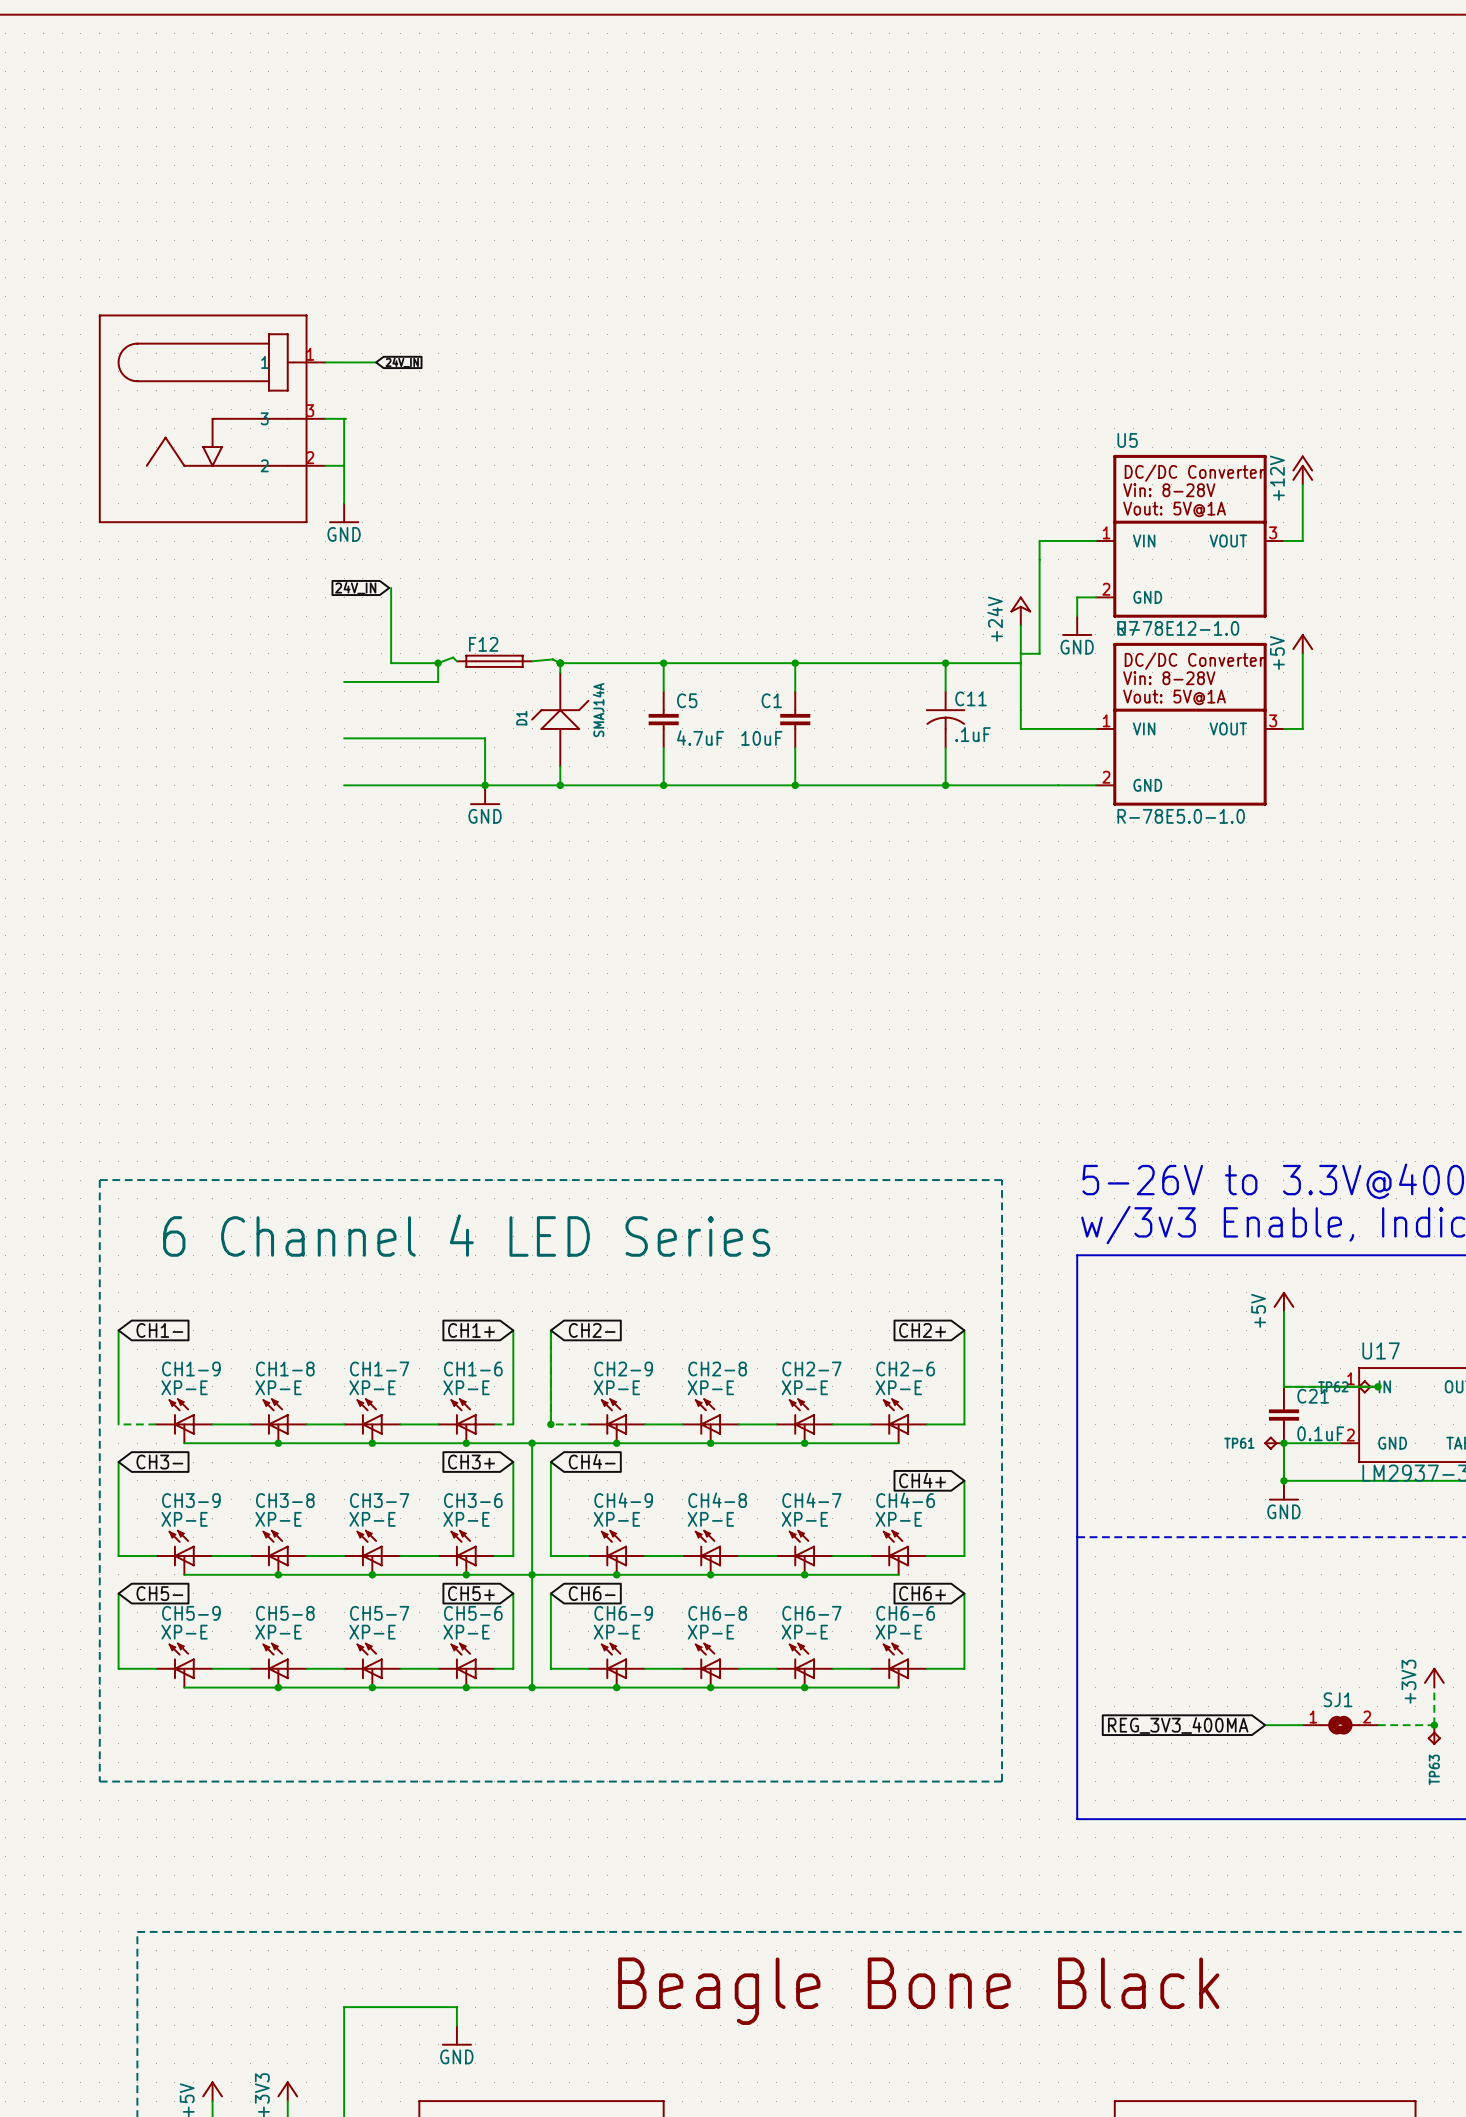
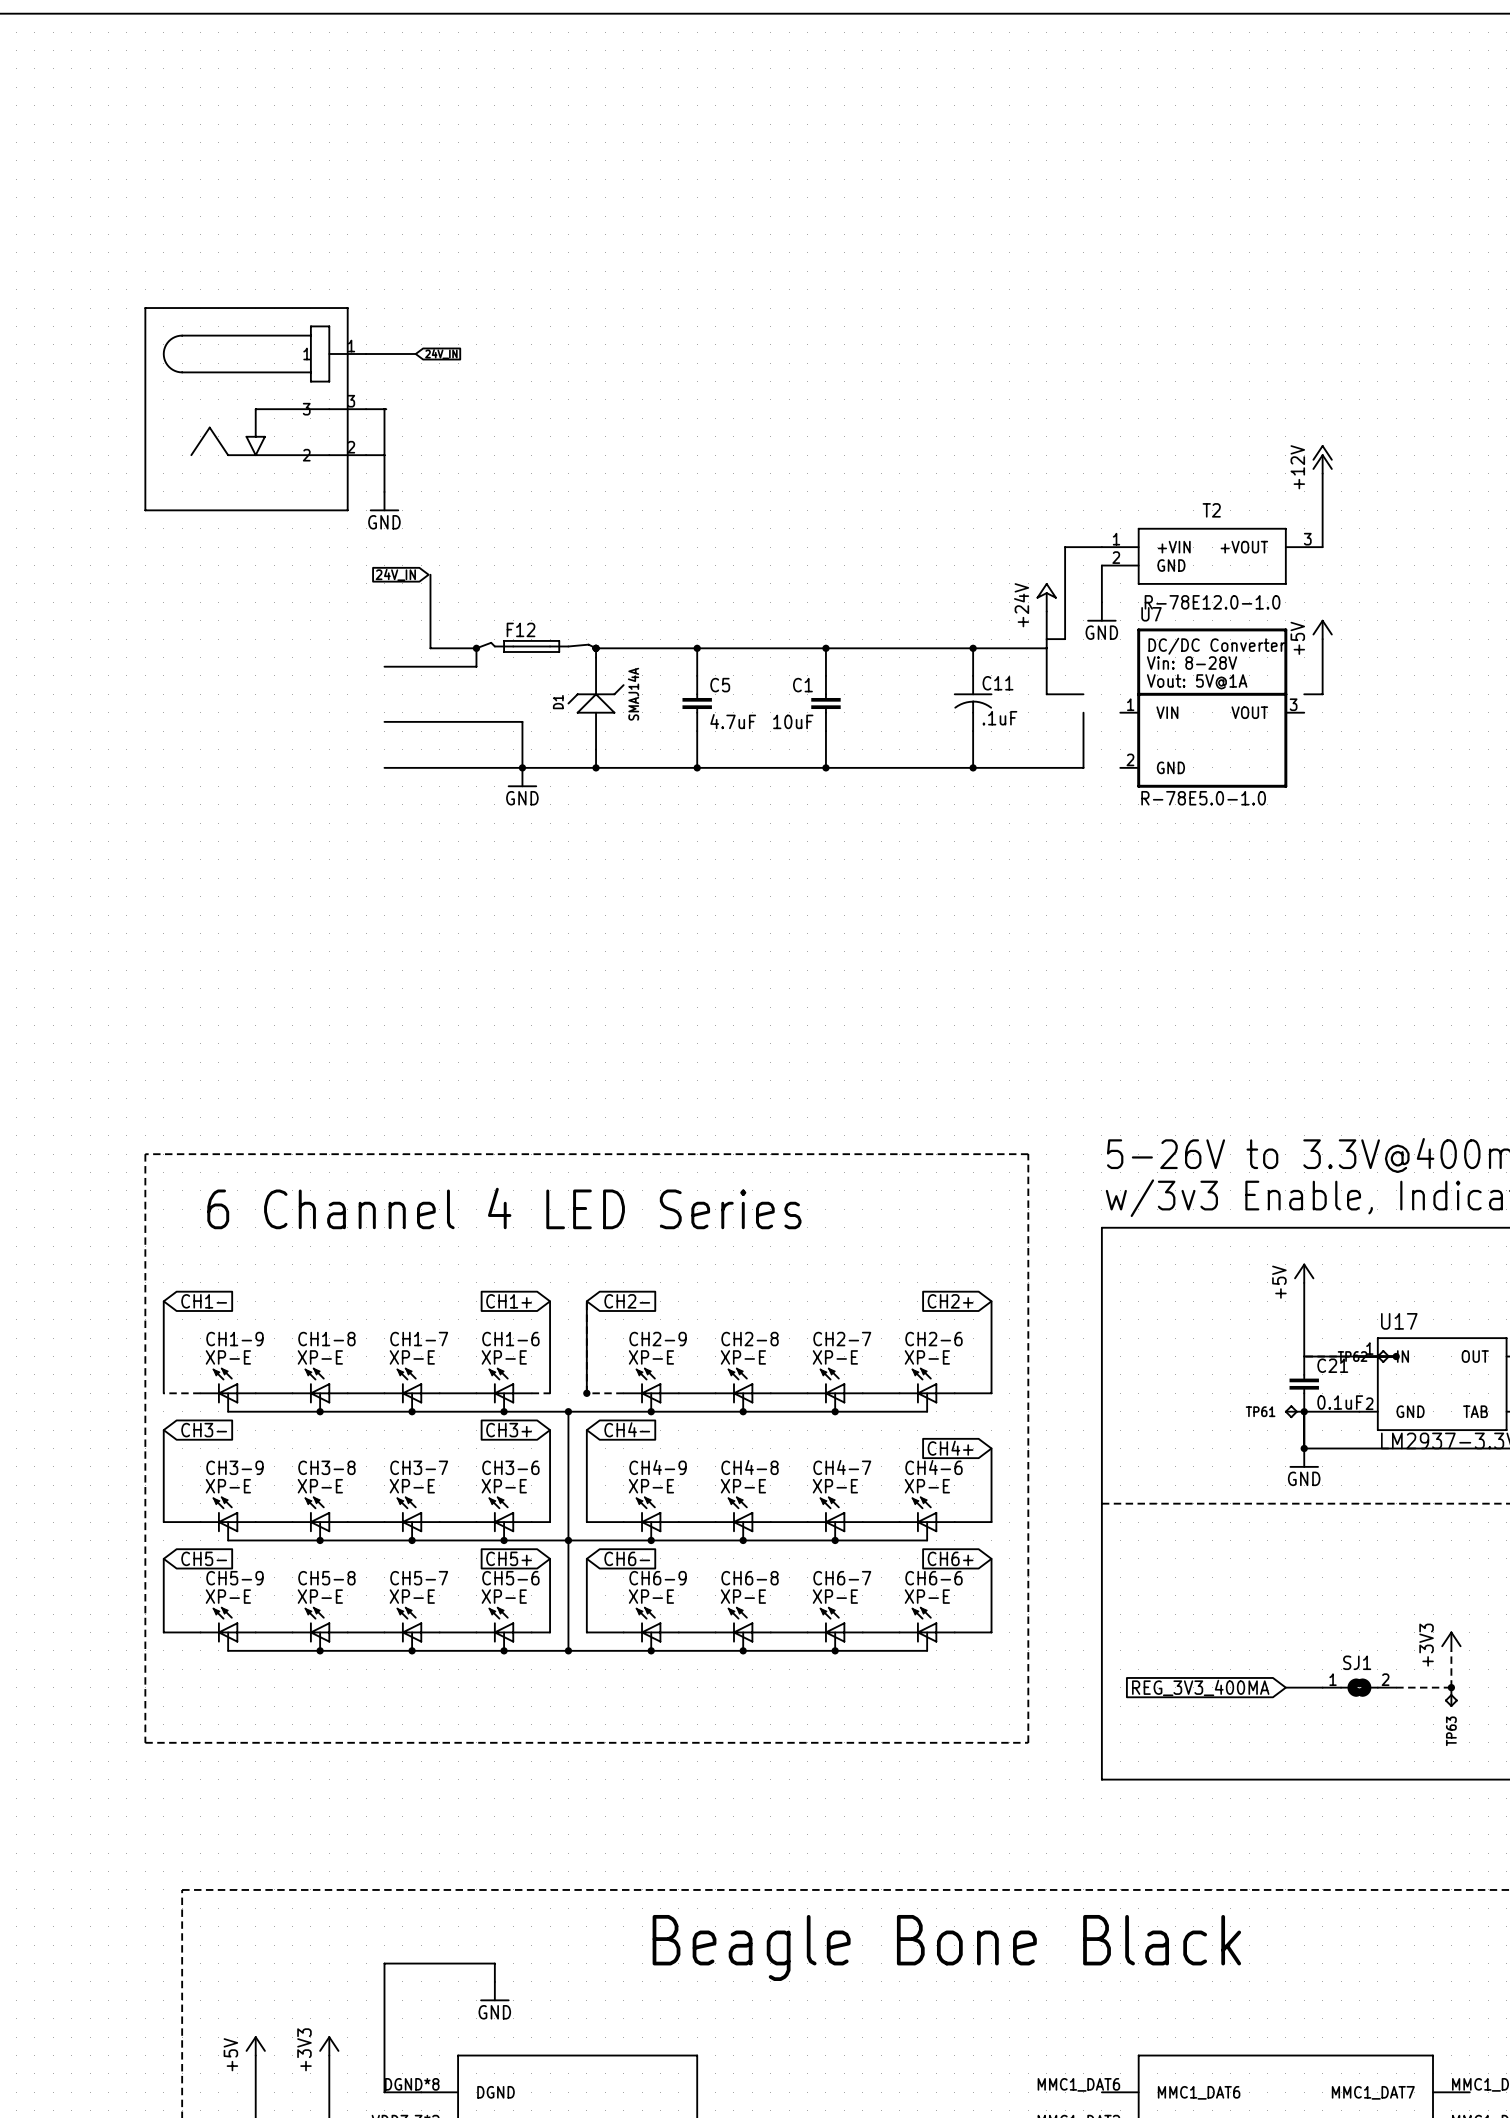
U5: R-78E12-1.0 (1189, 536) -> none
wire: (1095, 541) (1039, 541) (1039, 559) -> (1101, 547) (1065, 547)
wire: (1283, 541) (1302, 541) -> (1322, 547) (1322, 528)
T2: none -> R-78E12.0-1.0 (1212, 556)
wire: (1077, 597) (1095, 597) -> (1101, 583) (1101, 565)
wire: (1020, 710) (1020, 728) (1095, 728) -> (1046, 694) (1083, 694)
wire: (1302, 710) (1302, 728) (1283, 728) -> (1322, 694) (1304, 694)
wire: (1058, 785) (1095, 785) -> (1083, 767) (1083, 712)

